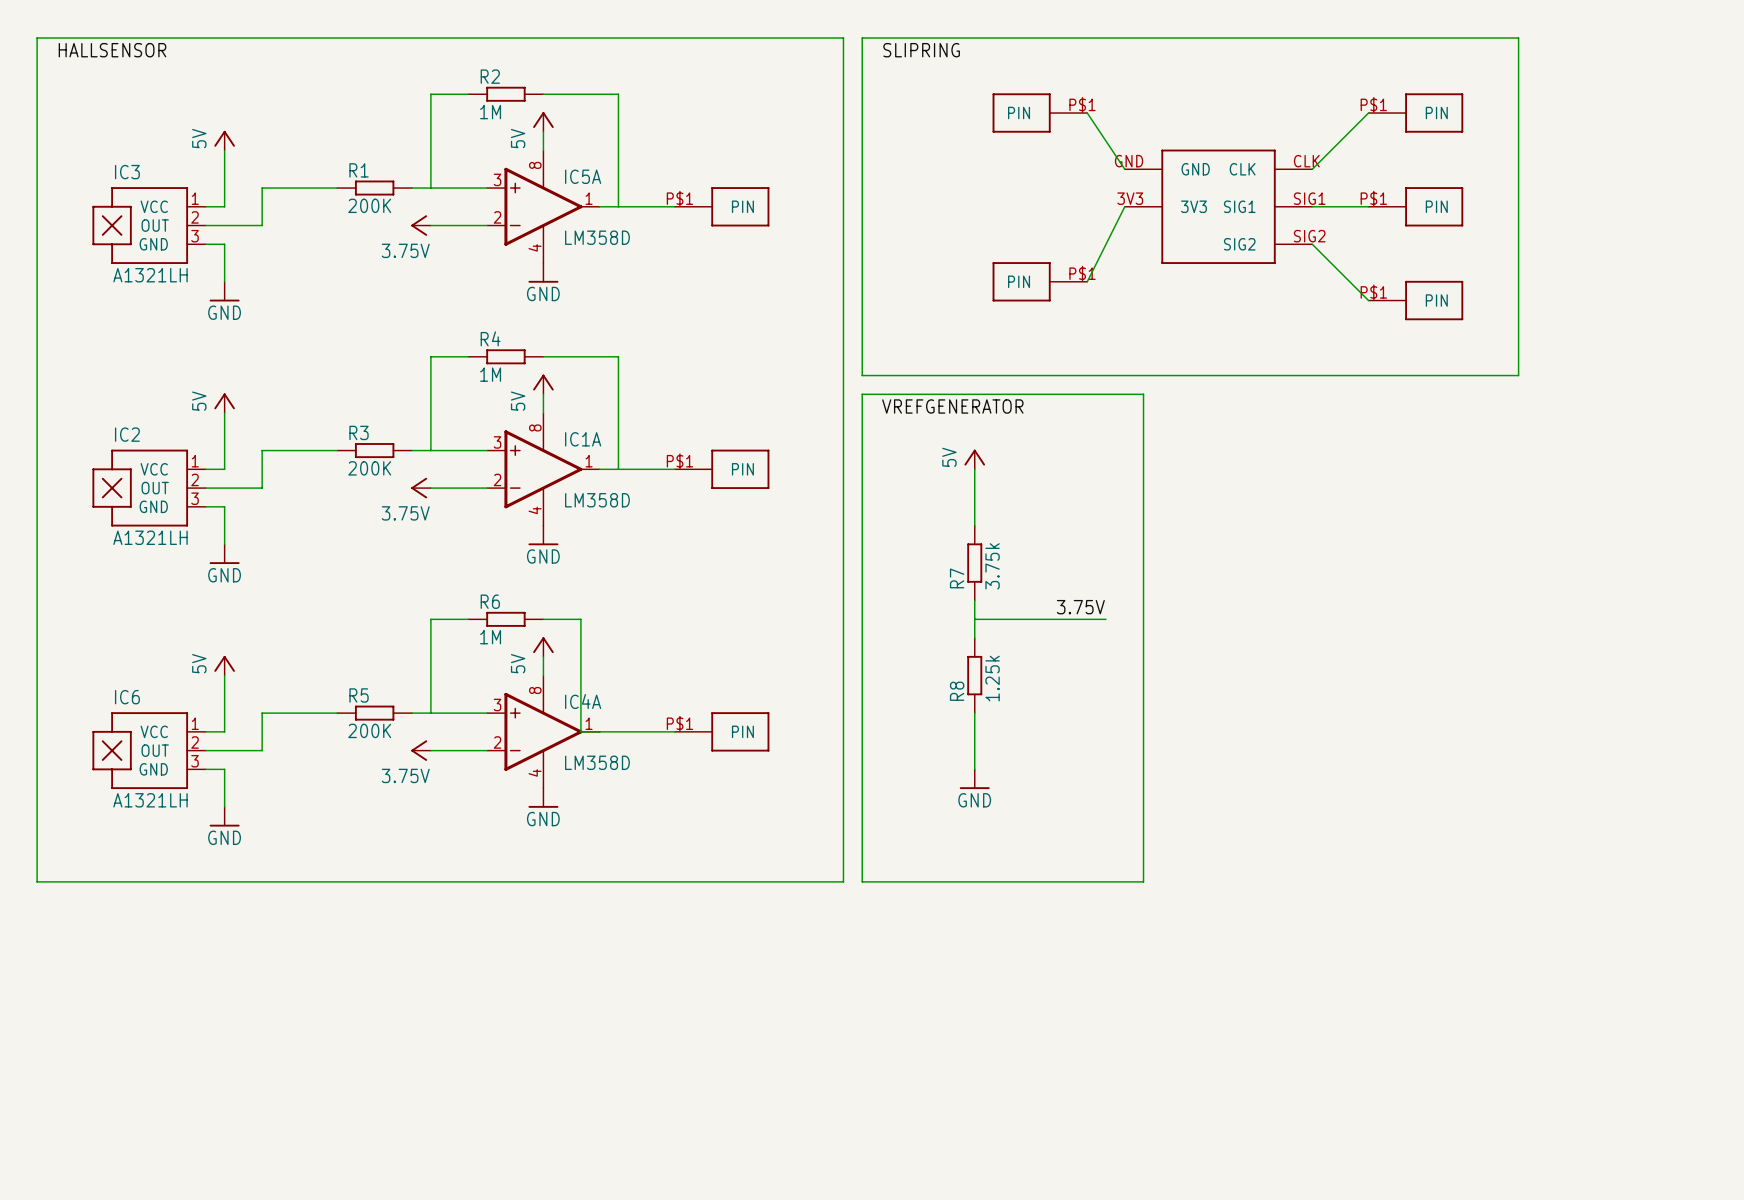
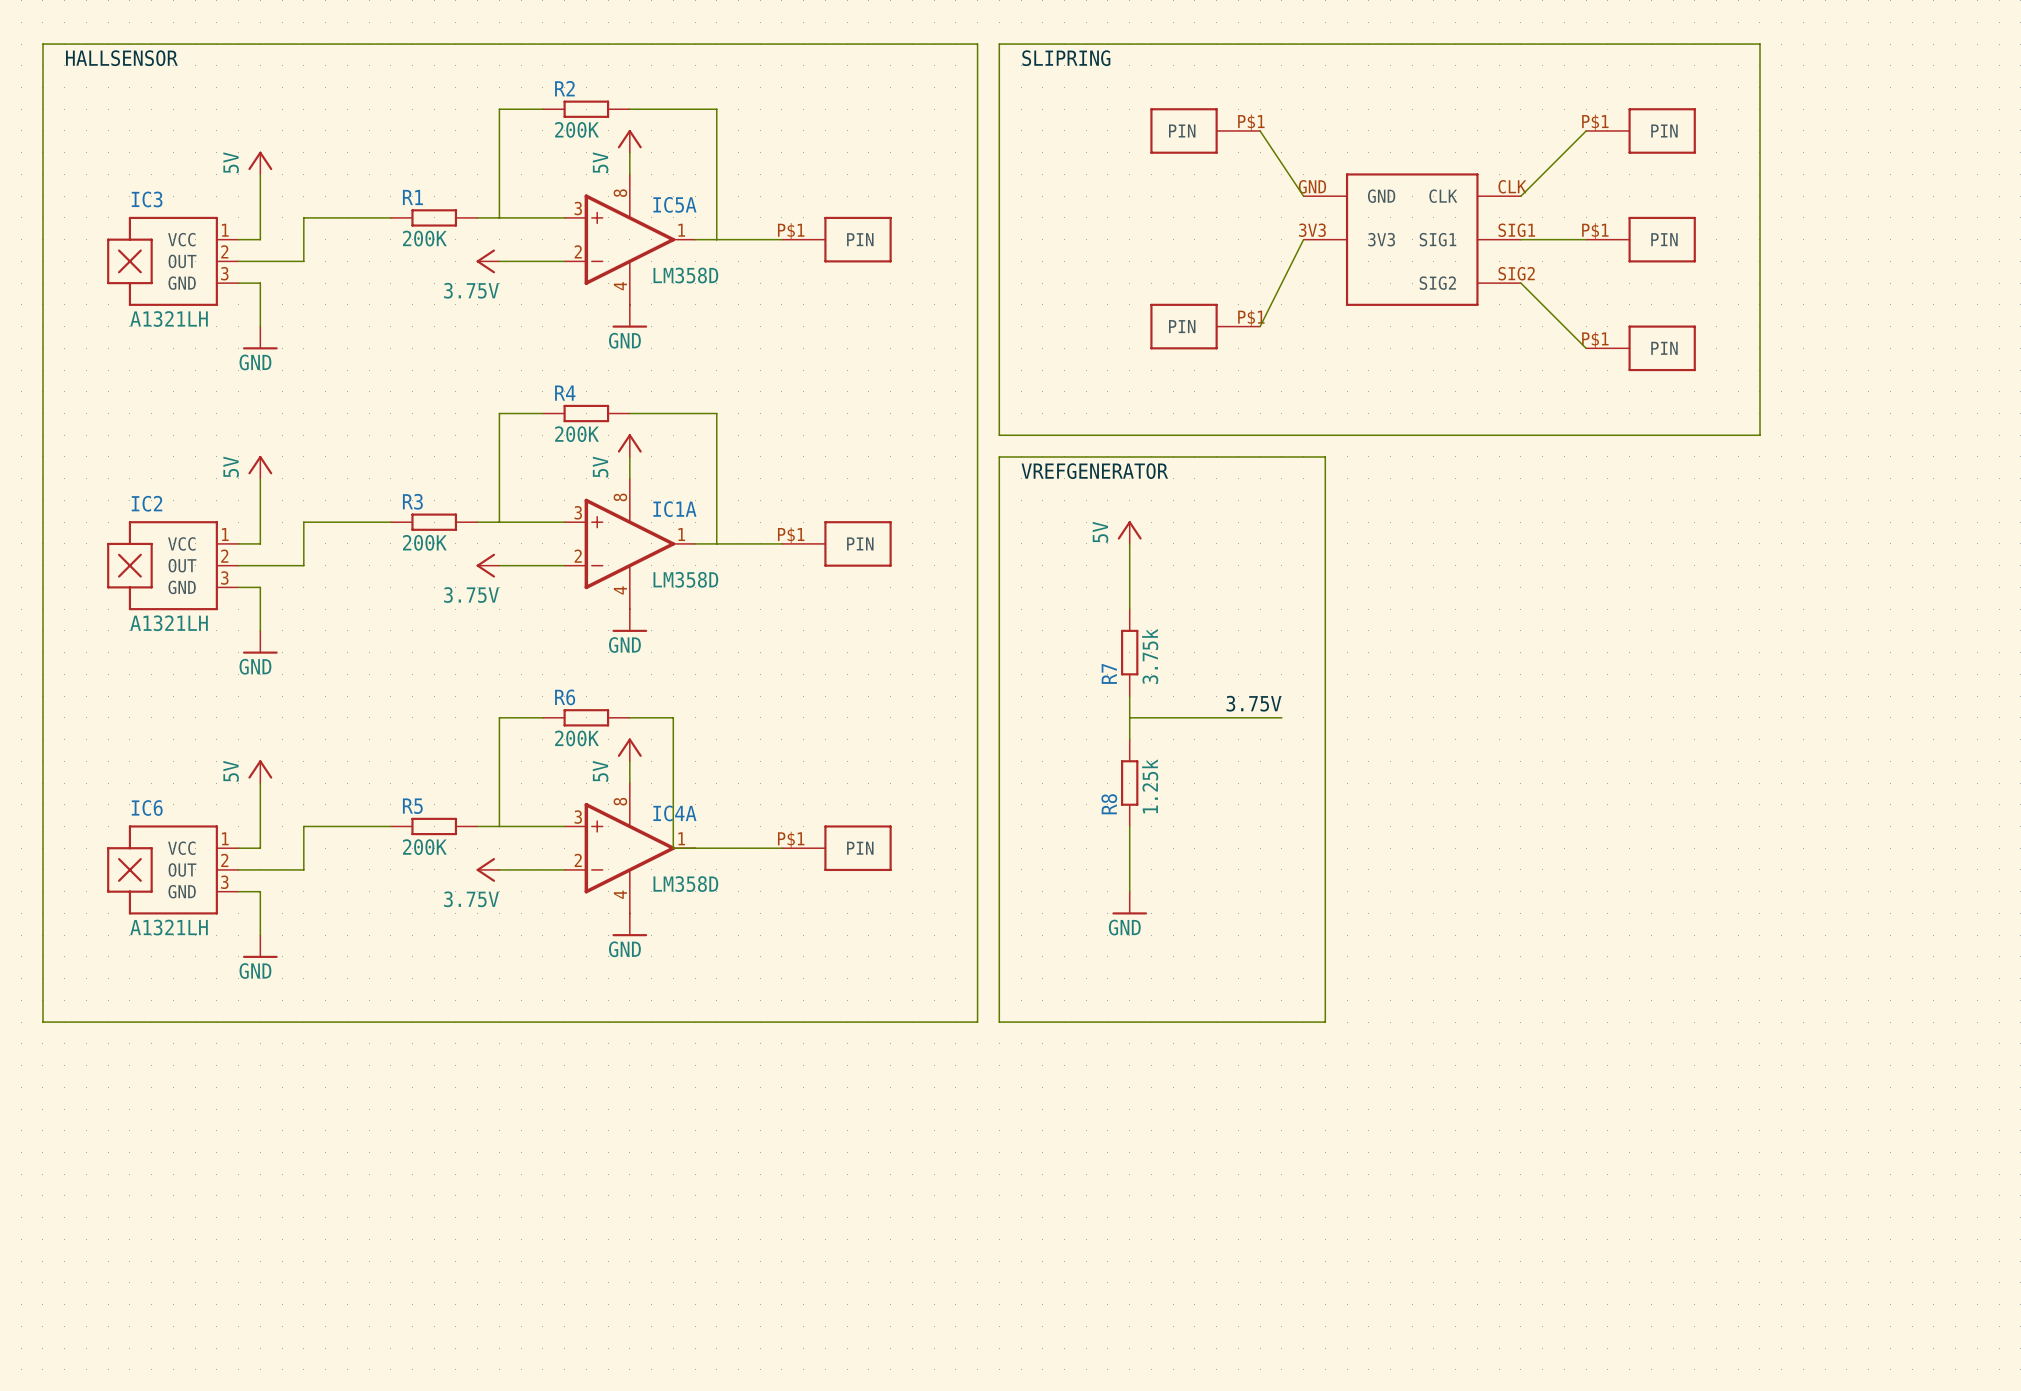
R2 value: 1M (490, 112) -> 200K (577, 129)
R4 value: 1M (490, 374) -> 200K (577, 434)
R6 value: 1M (490, 637) -> 200K (577, 738)

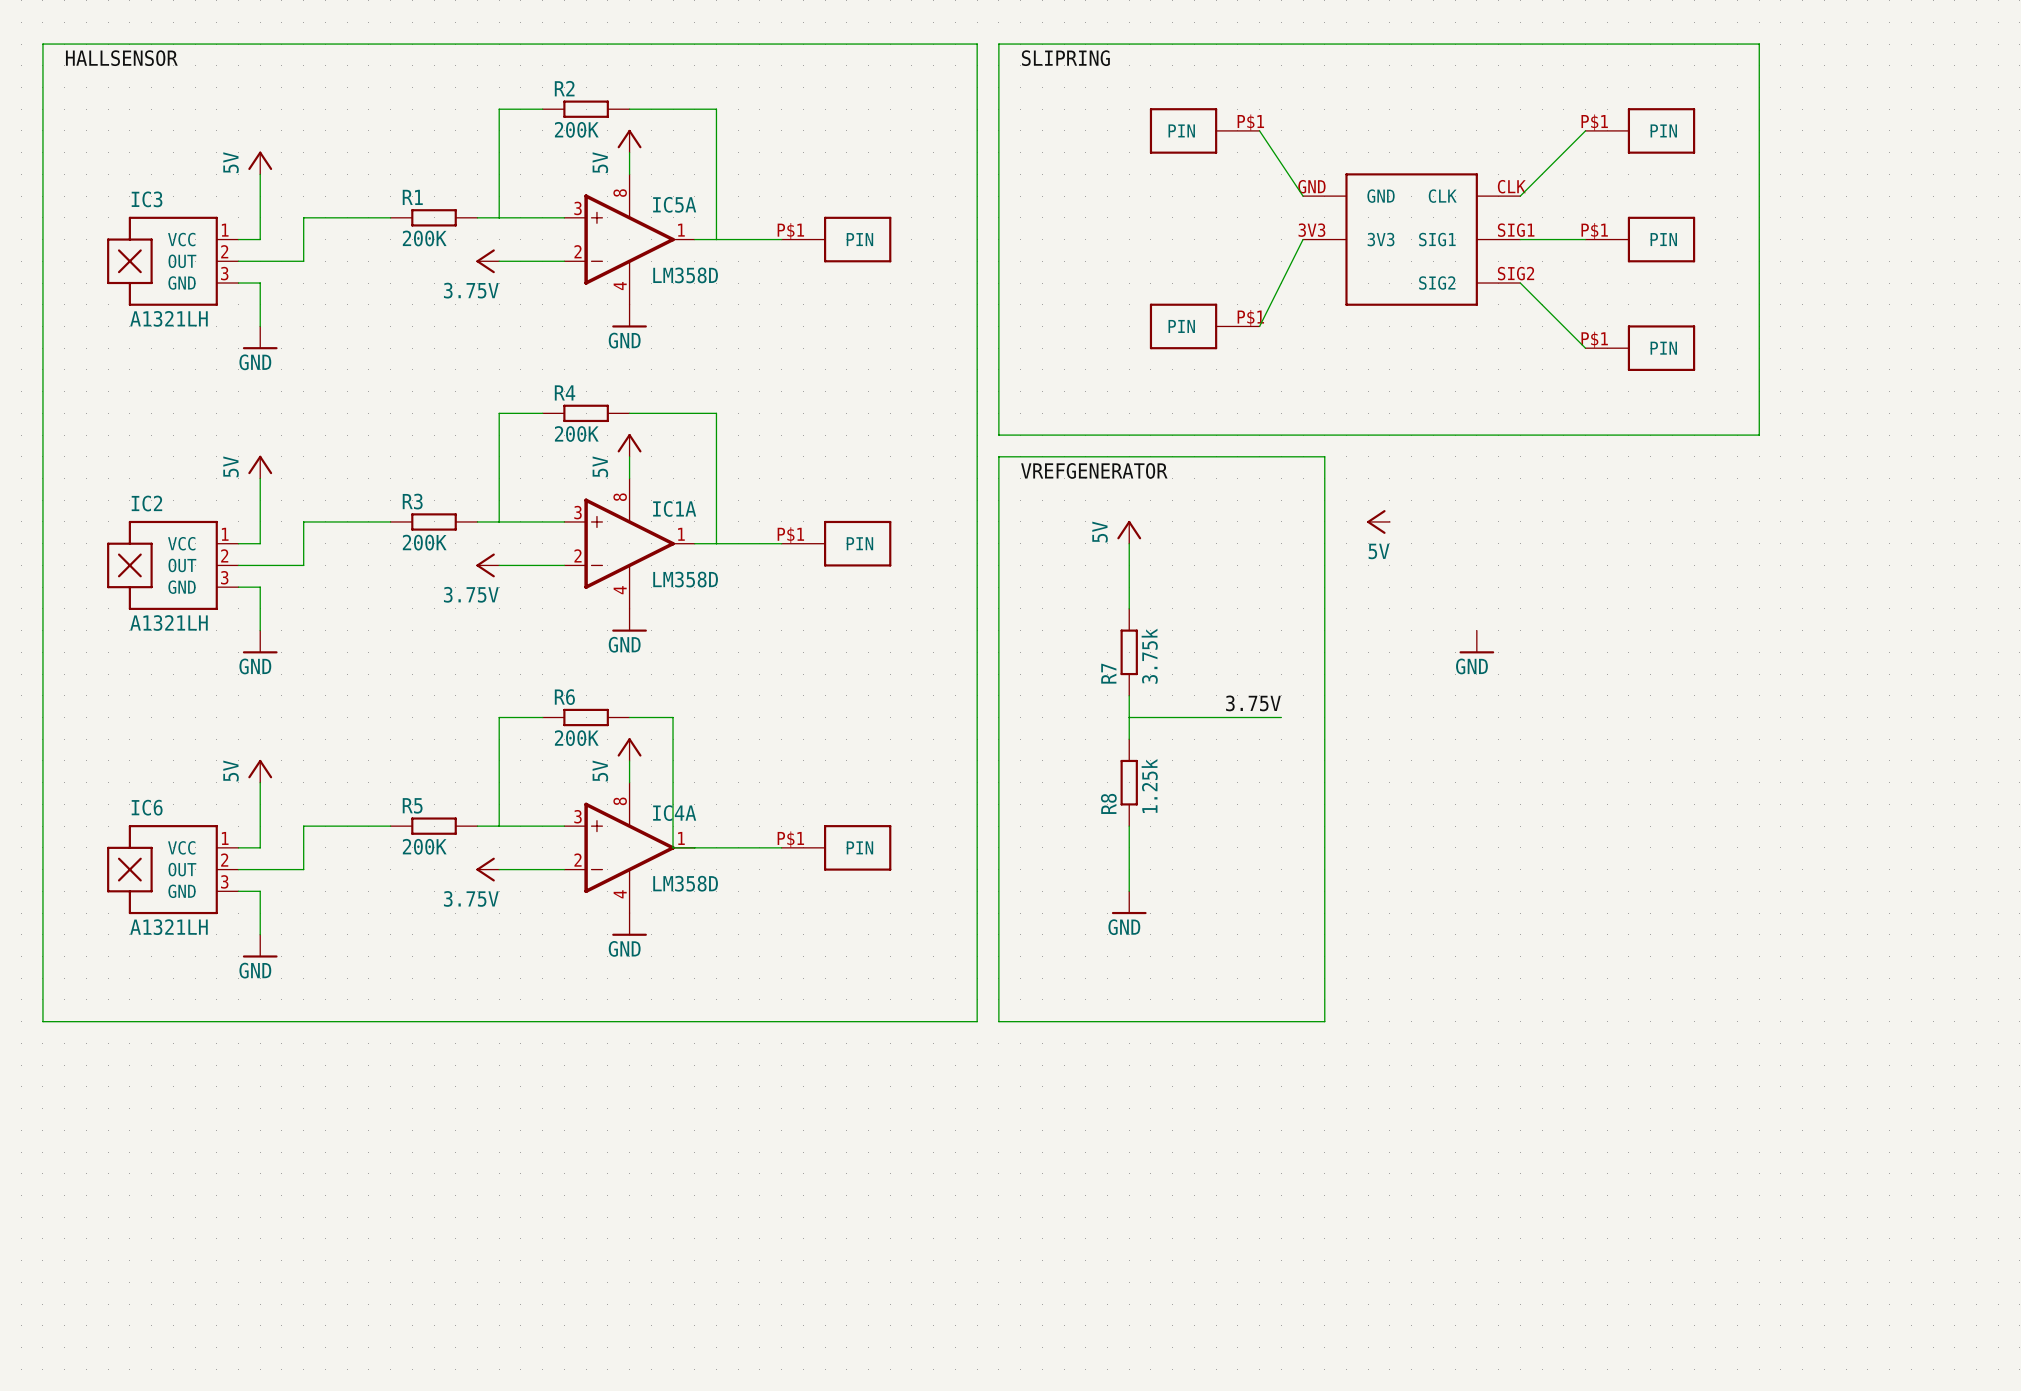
power symbol: none -> 5V (1378, 521)
power symbol: none -> GND (1476, 642)

